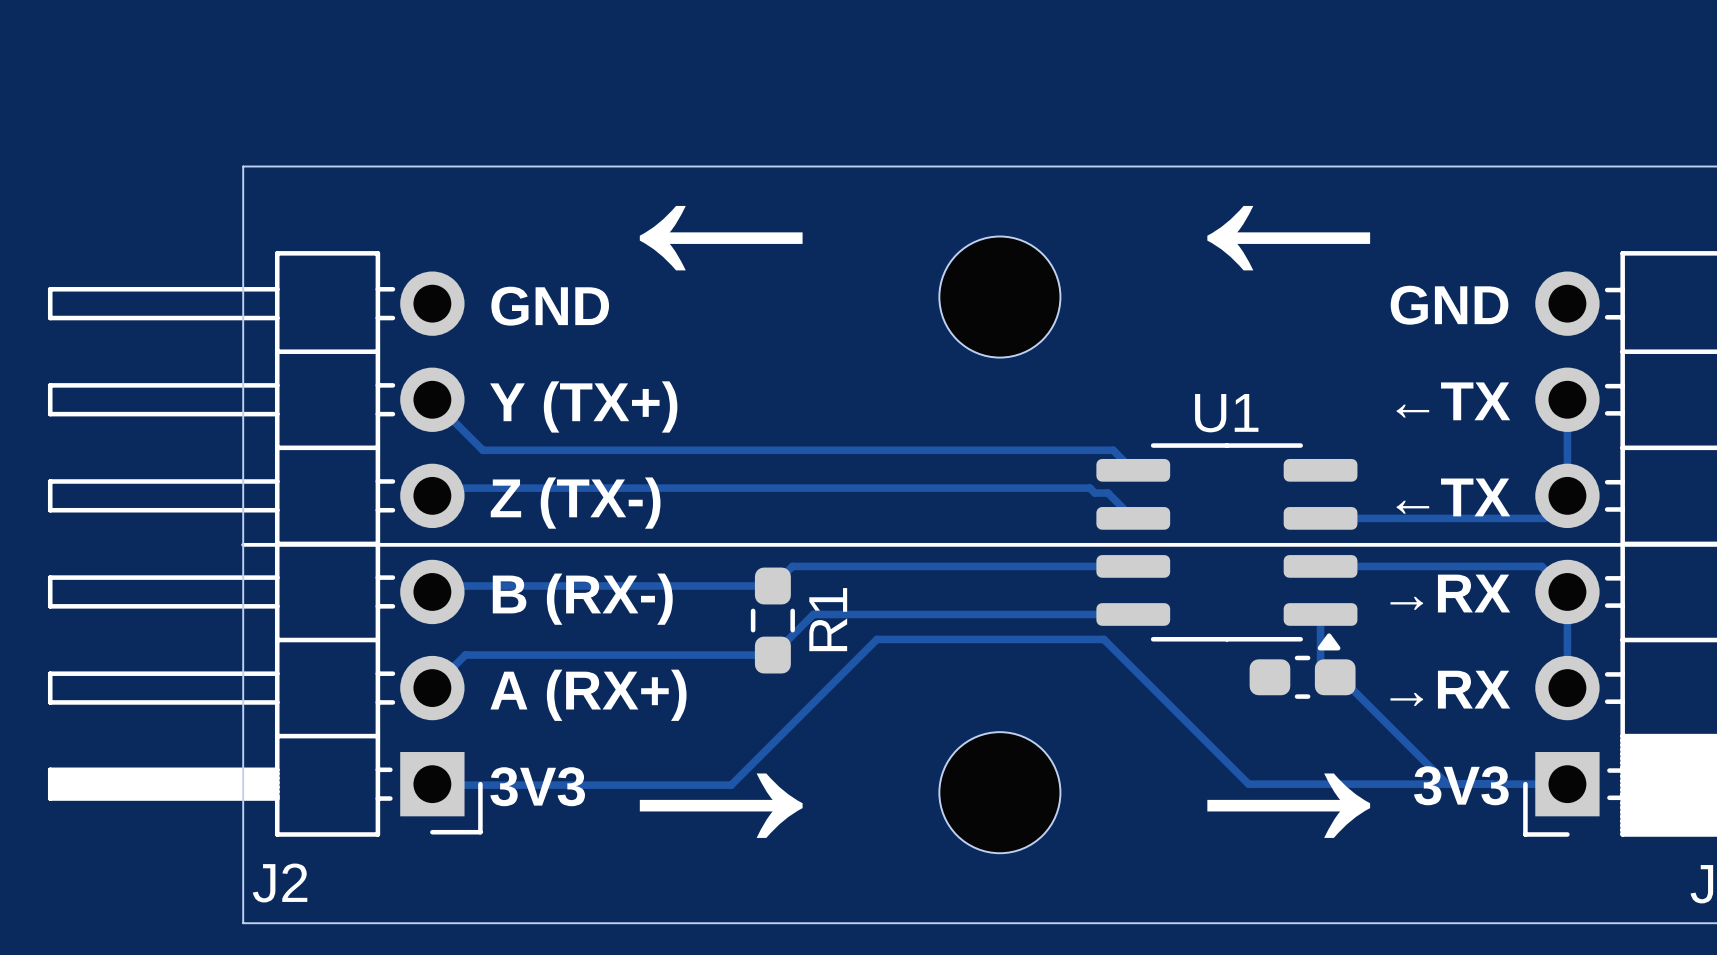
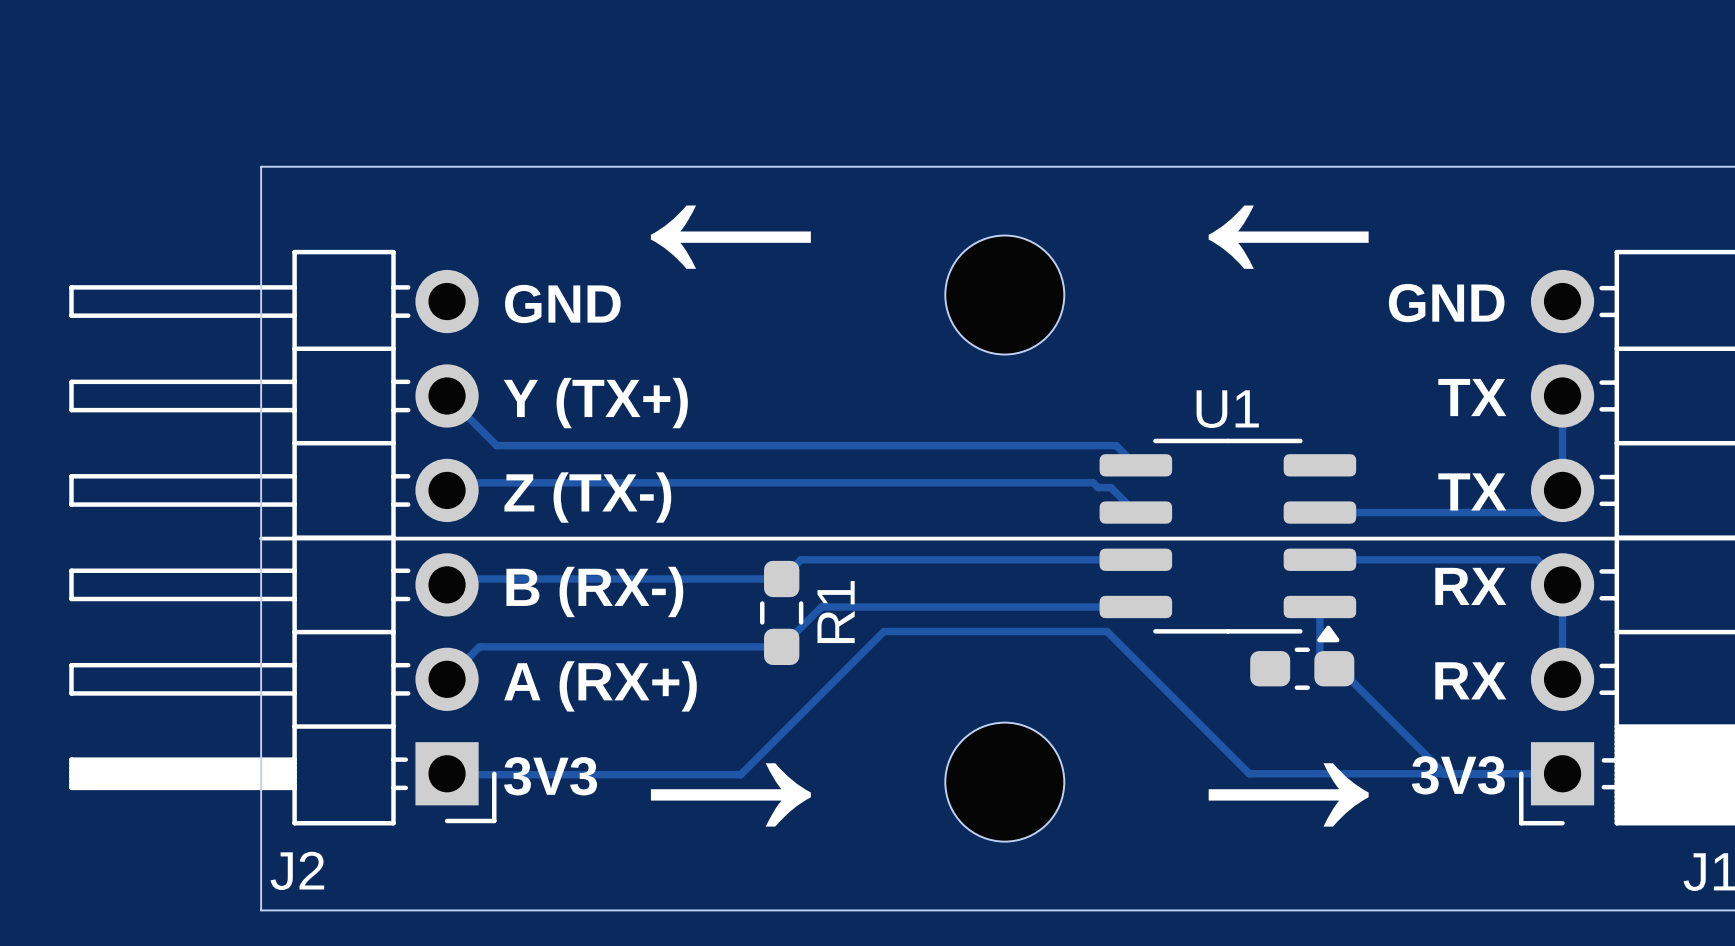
text: ←TX (1453, 401) -> TX (1472, 397)
text: ←TX (1453, 497) -> TX (1472, 491)
text: →RX (1450, 593) -> RX (1470, 586)
text: →RX (1450, 689) -> RX (1470, 680)

